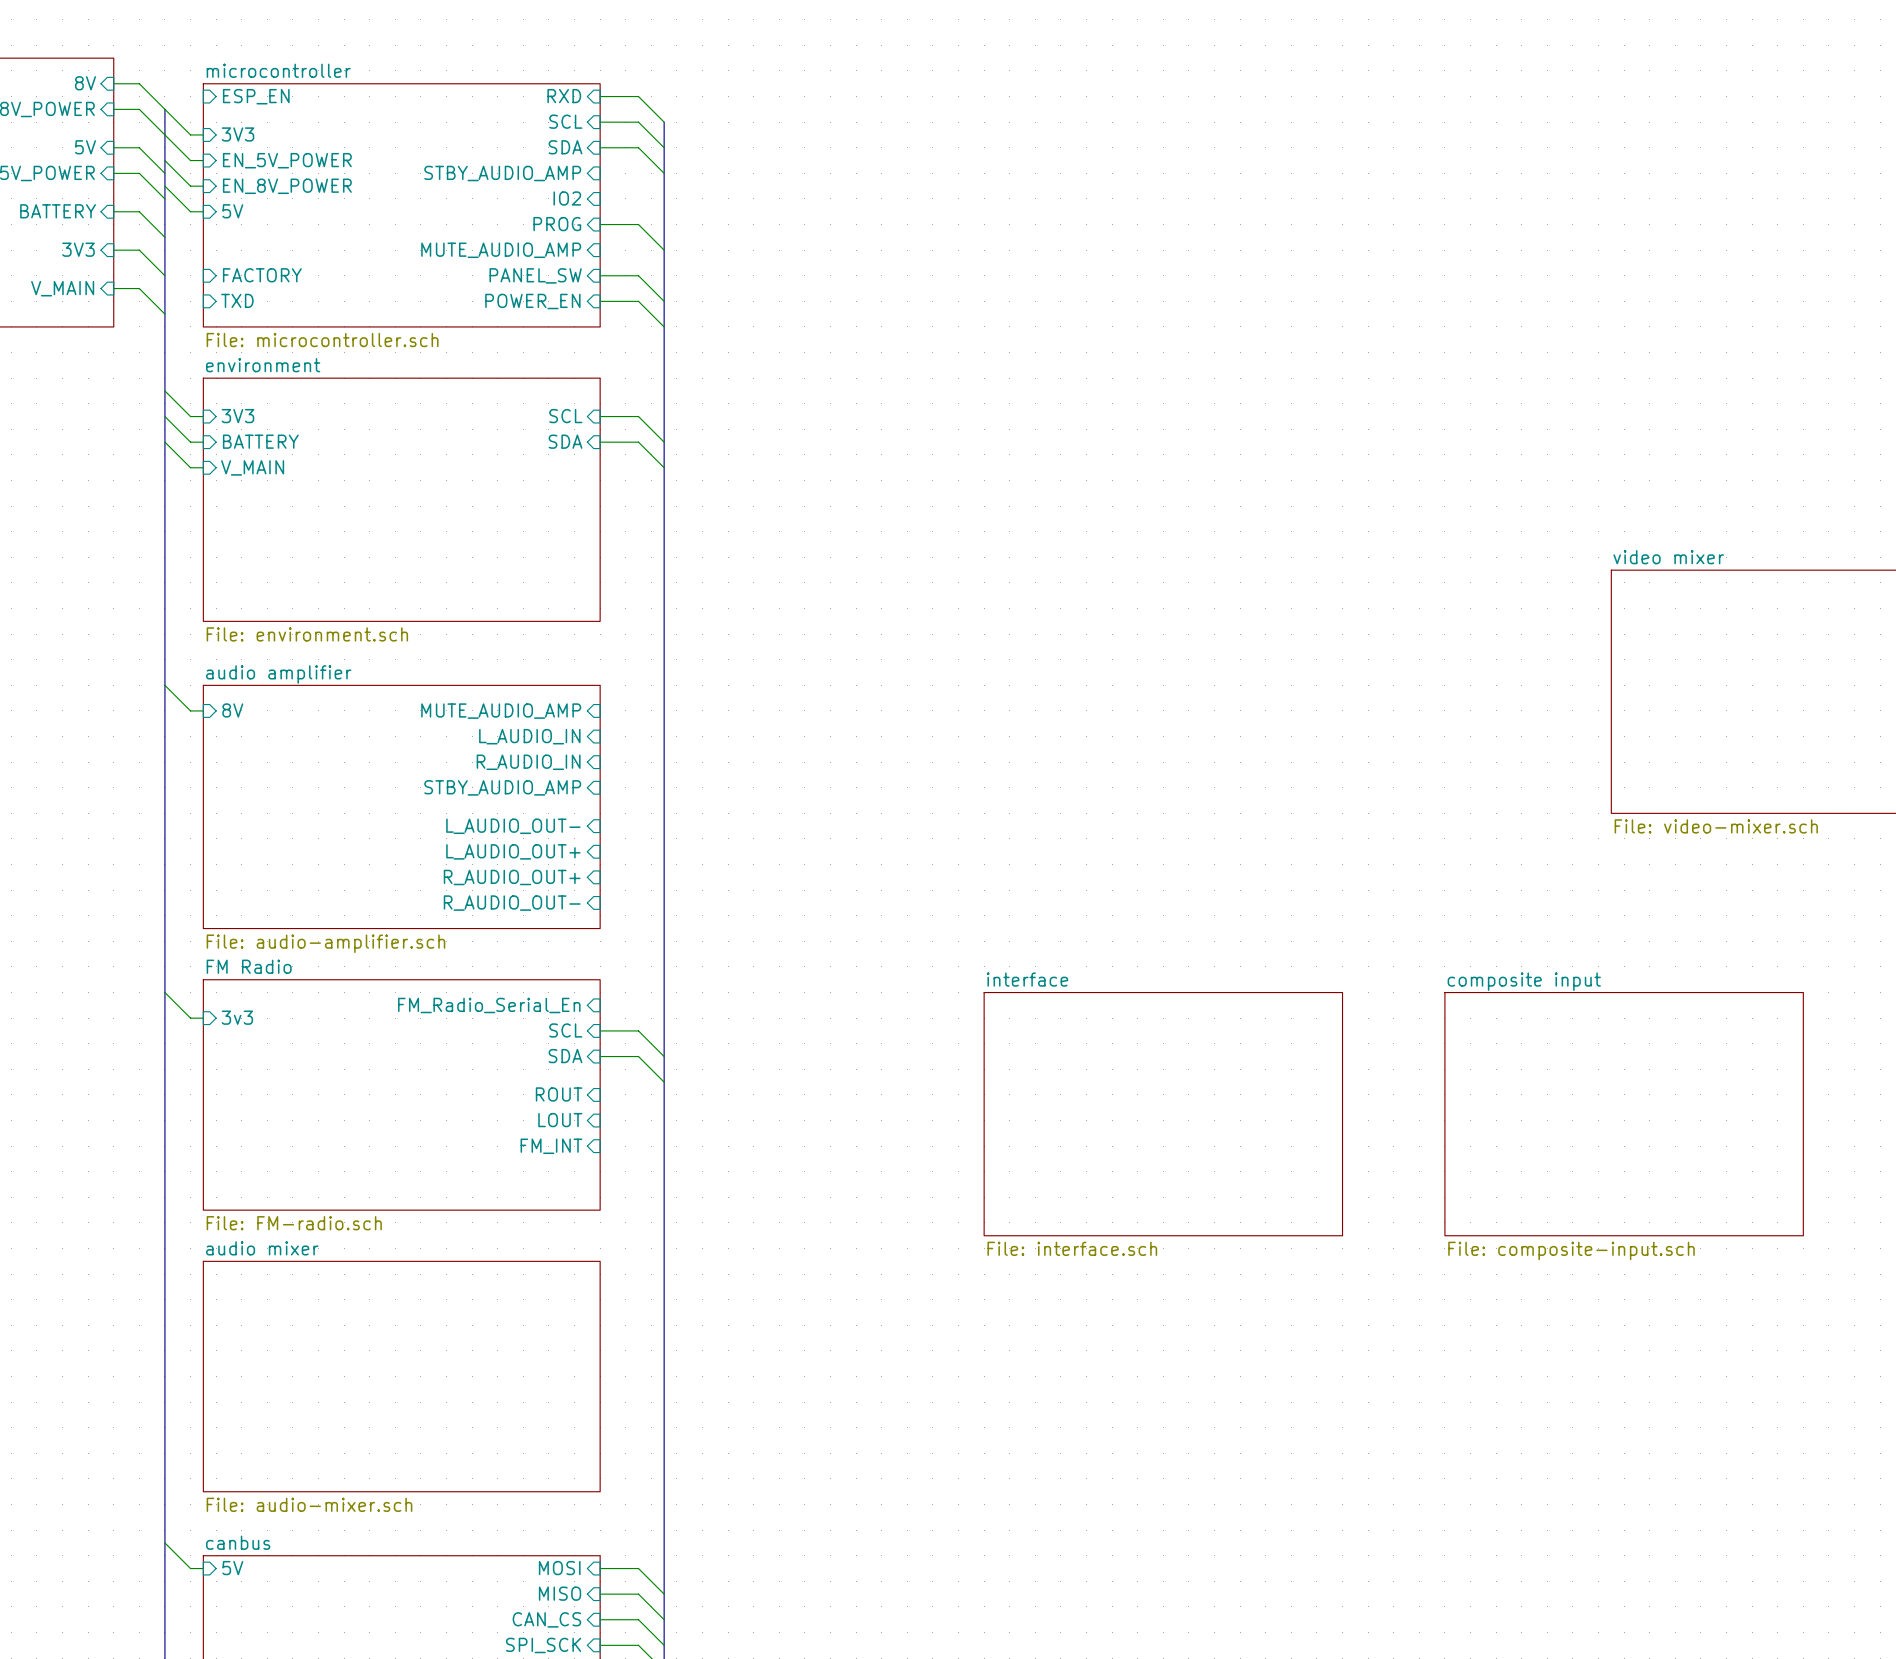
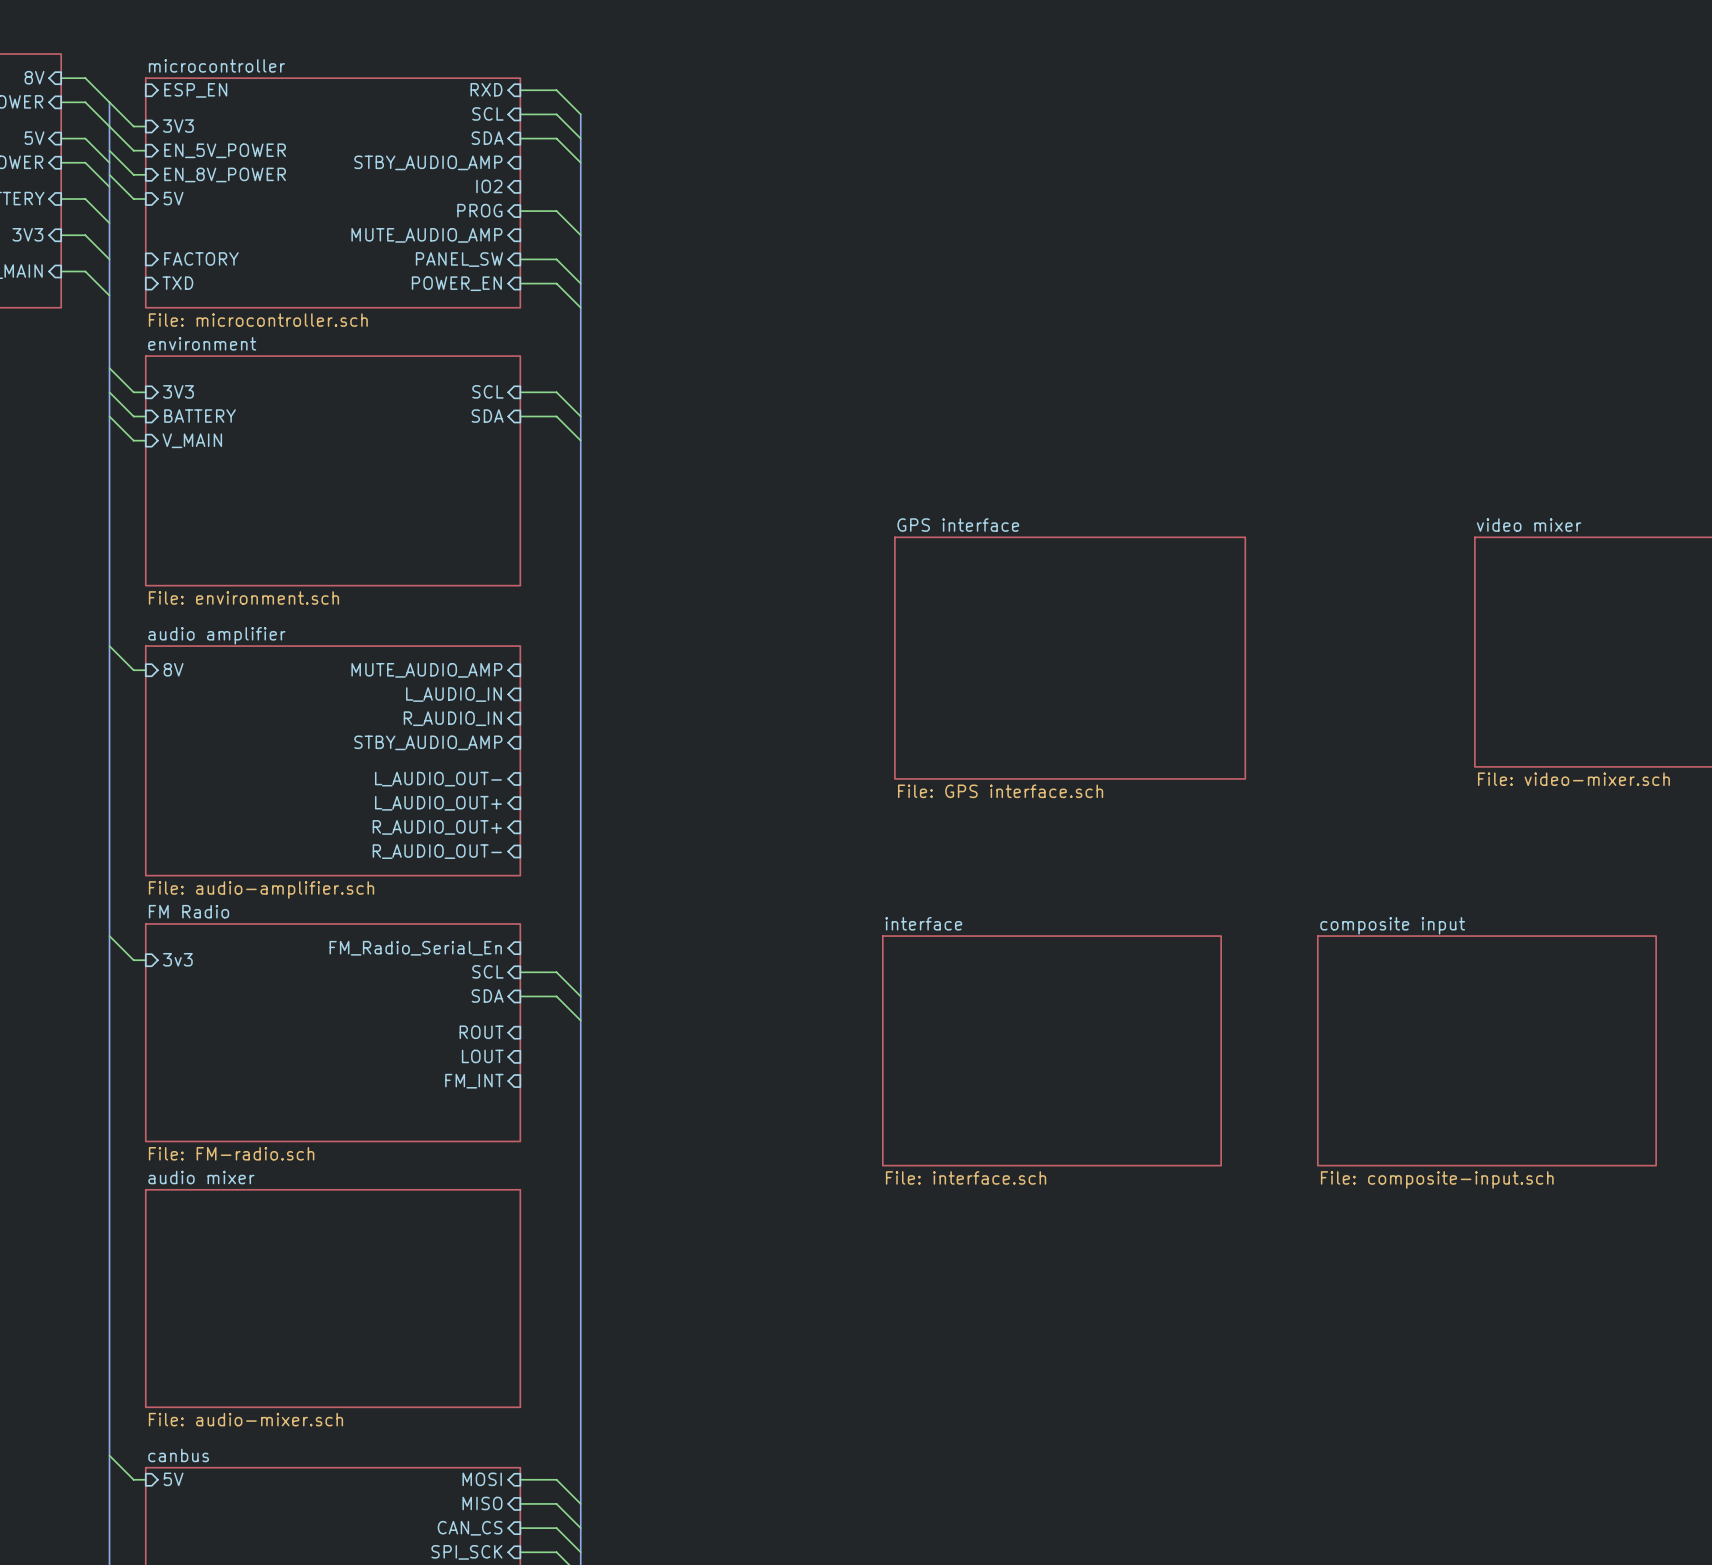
sheet GPS interface: none -> File: GPS interface.sch (1070, 658)

